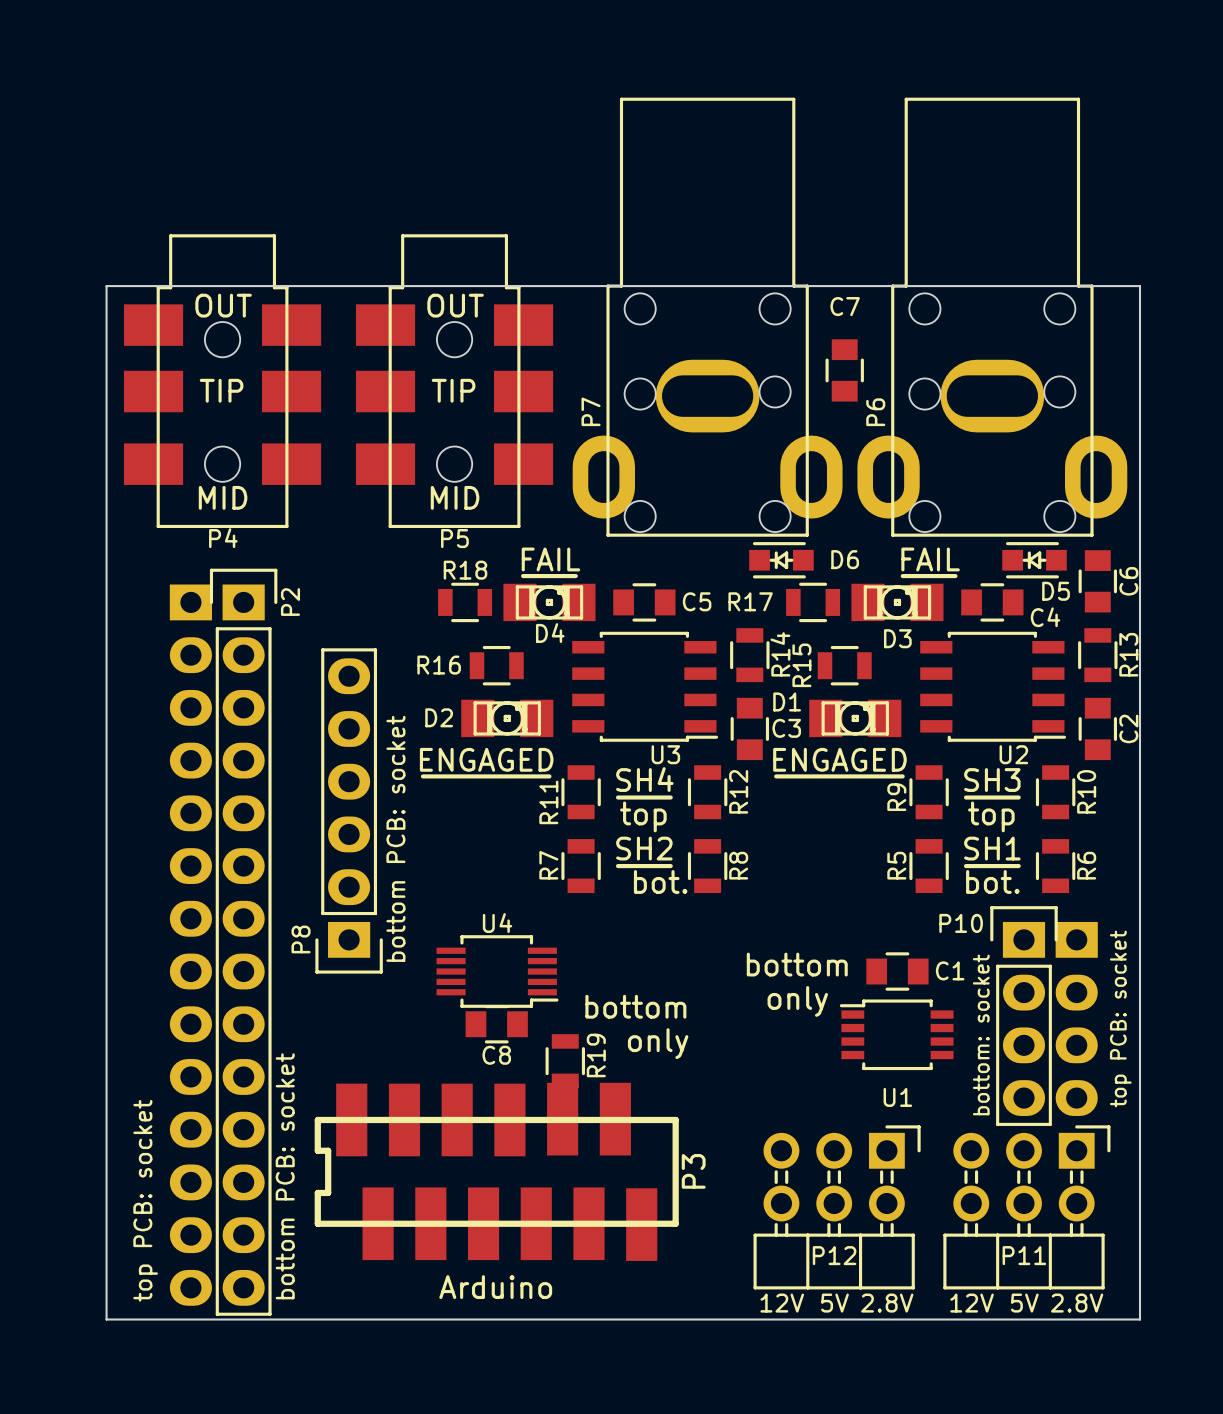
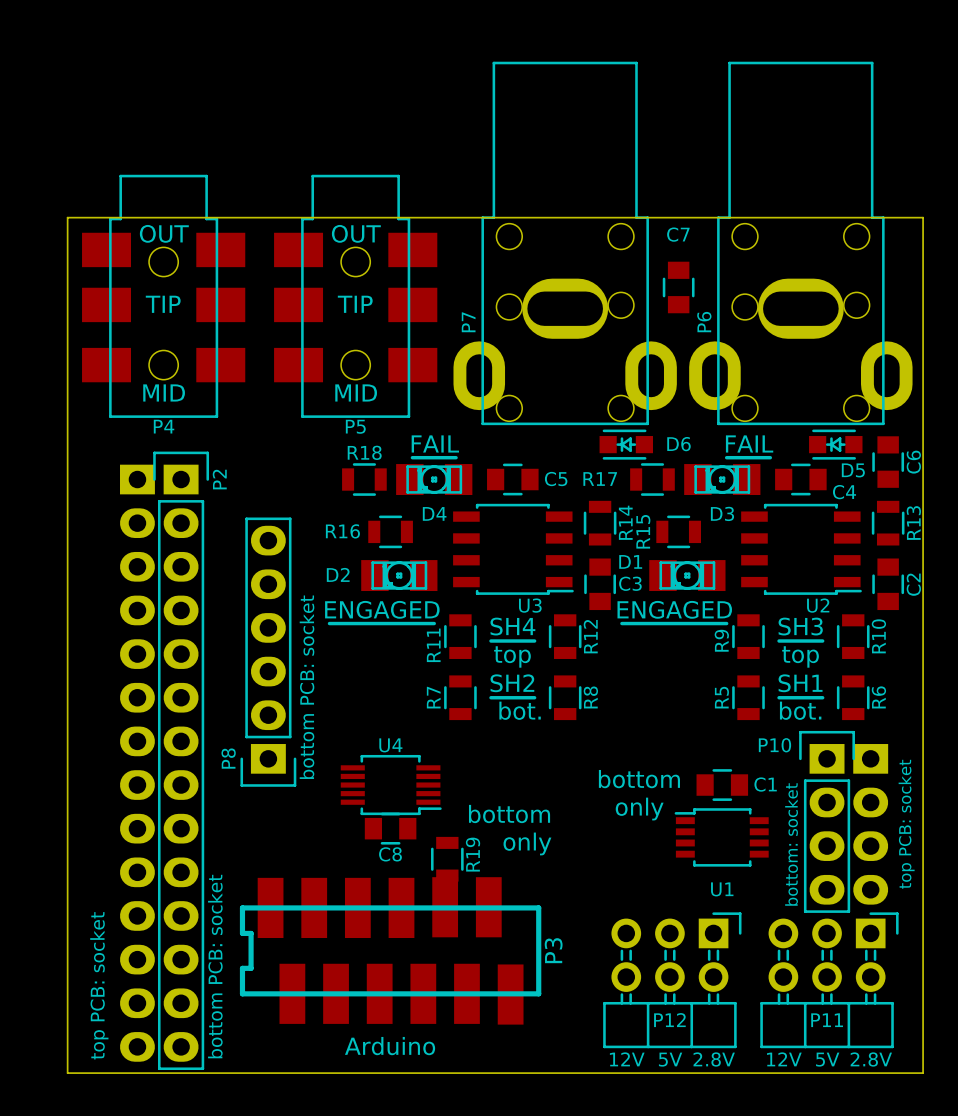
D4 rotation: 0° (549, 602) -> 180° (434, 479)
D3 rotation: 0° (897, 602) -> 180° (722, 479)
D2 rotation: 0° (507, 718) -> 180° (399, 575)
D1 rotation: 0° (855, 718) -> 180° (687, 575)

